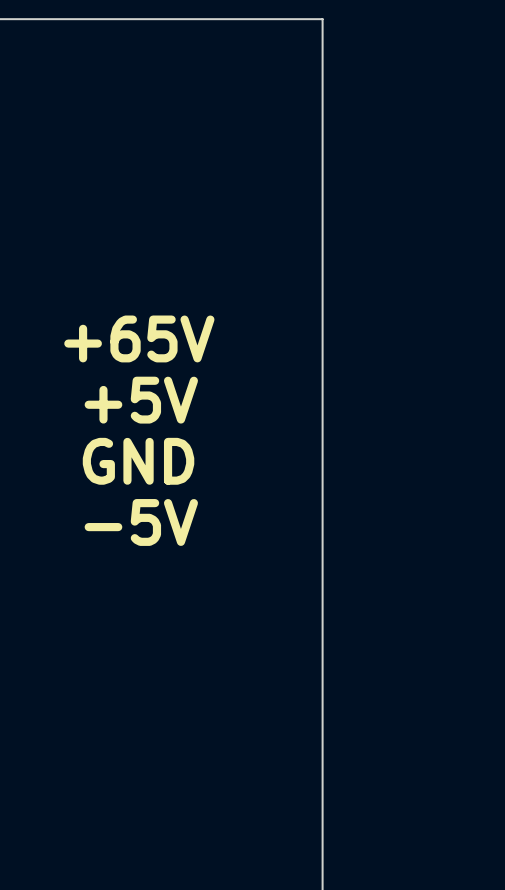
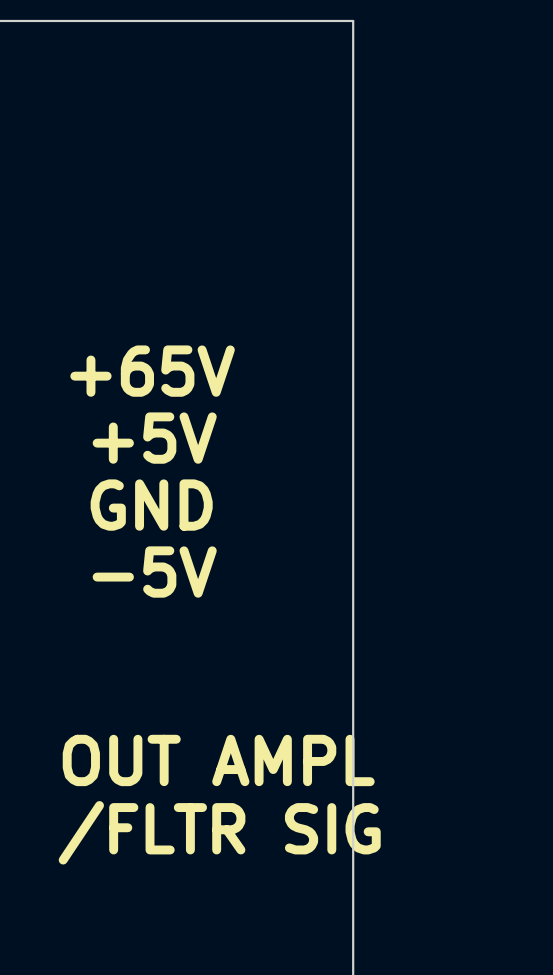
text: none -> OUT AMPL (218, 760)
text: none -> /FLTR SIG (219, 832)

